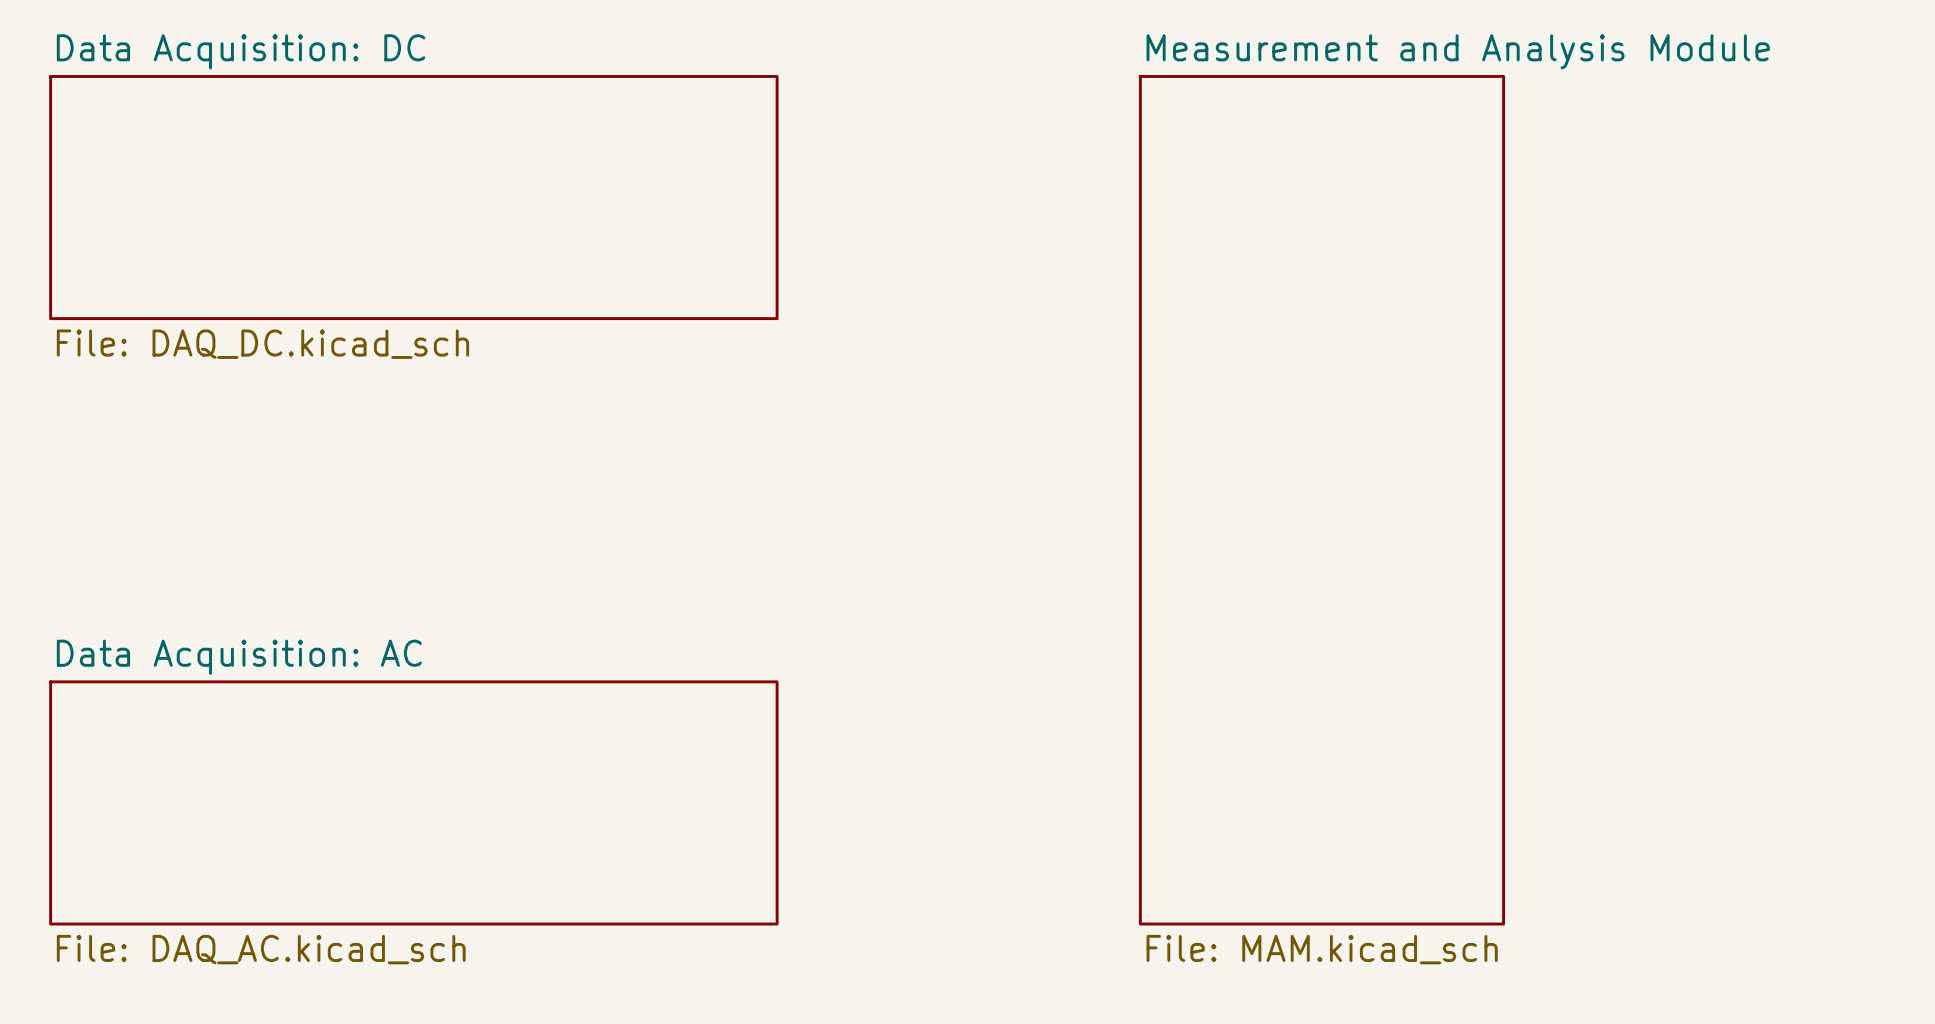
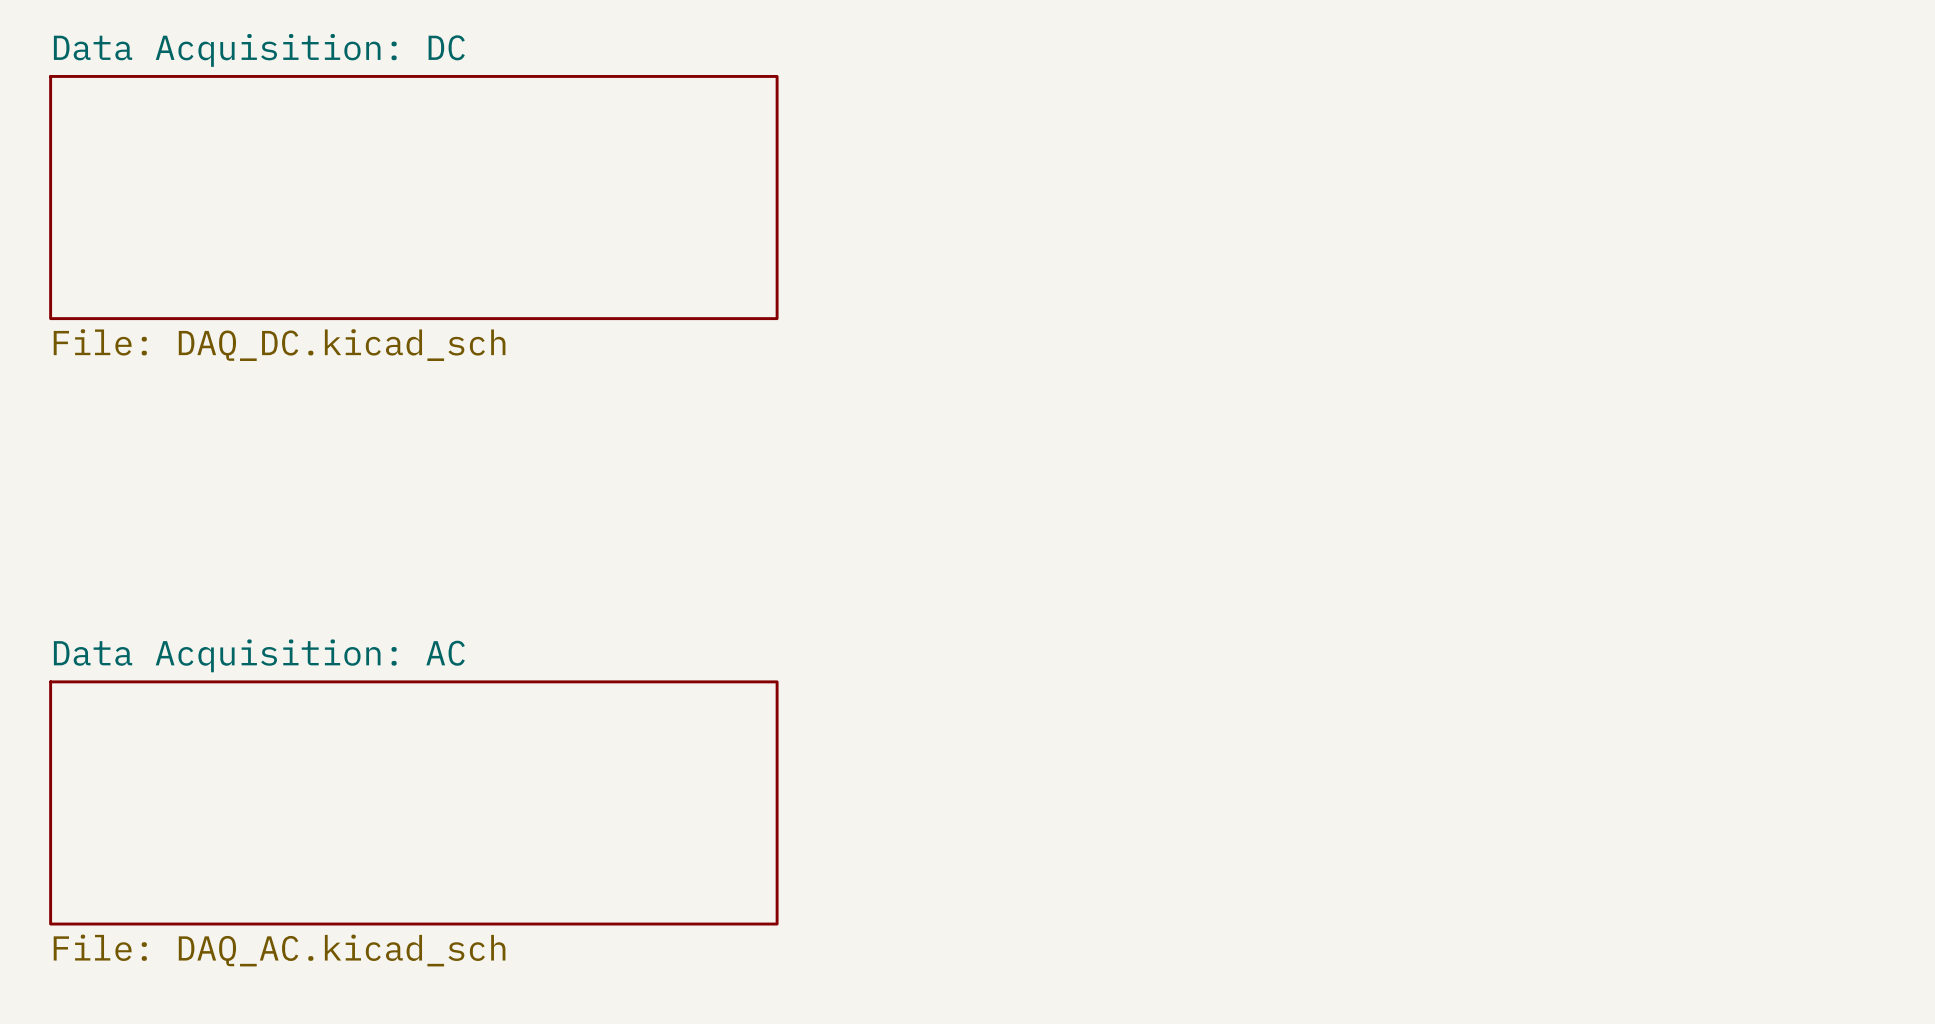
sheet Measurement and Analysis Module: File: MAM.kicad_sch (1321, 500) -> none

